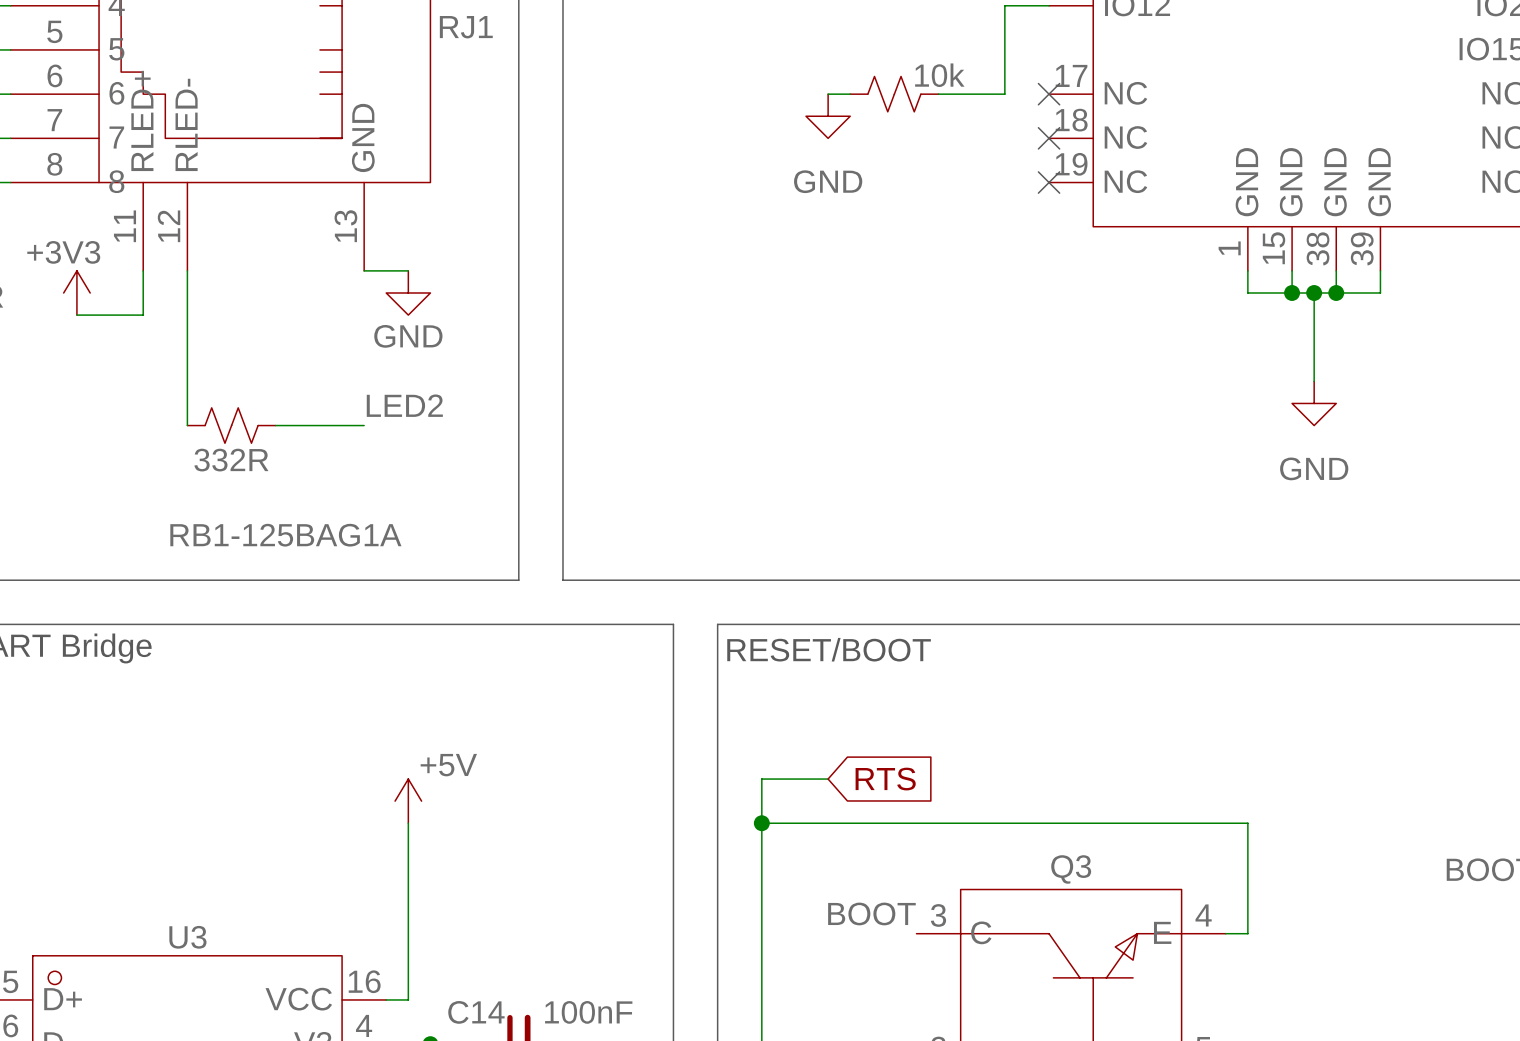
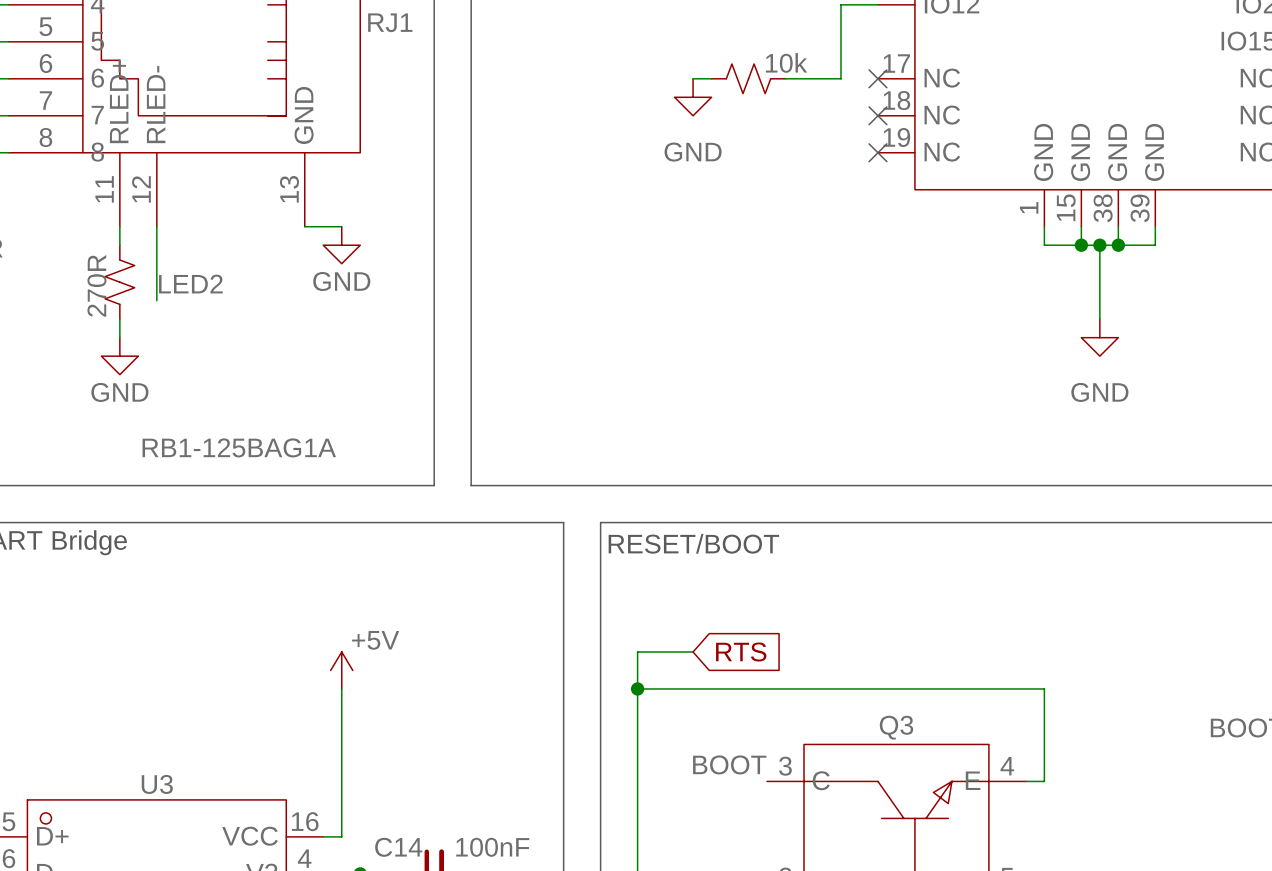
power symbol: +3V3 (76, 292) -> none
wire: (143, 292) (143, 315) (76, 315) -> none
part: none -> 270R (119, 282)
wire: (187, 359) (187, 425) -> none
wire: none -> (119, 319) (119, 337)
label position: LED2 (404, 405) -> LED2 (190, 284)
power symbol: none -> GND (119, 356)
part: 332R (231, 425) -> none
wire: (275, 425) (364, 425) -> none

